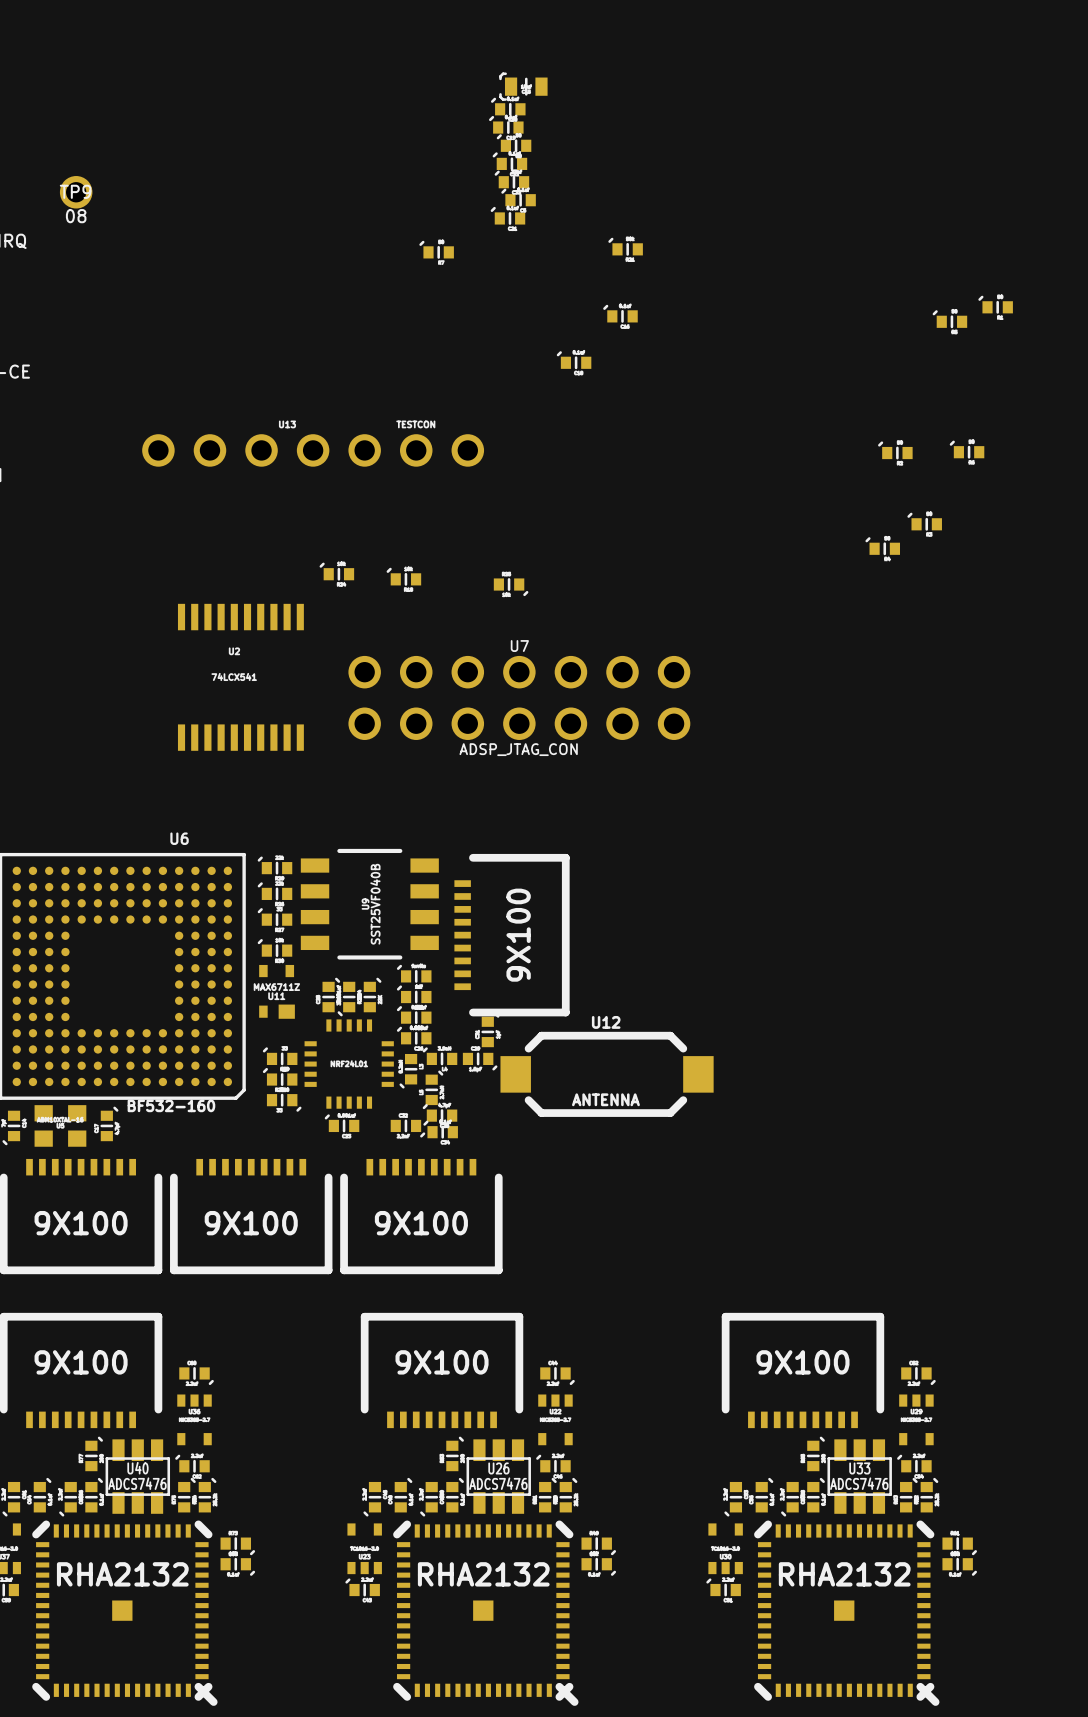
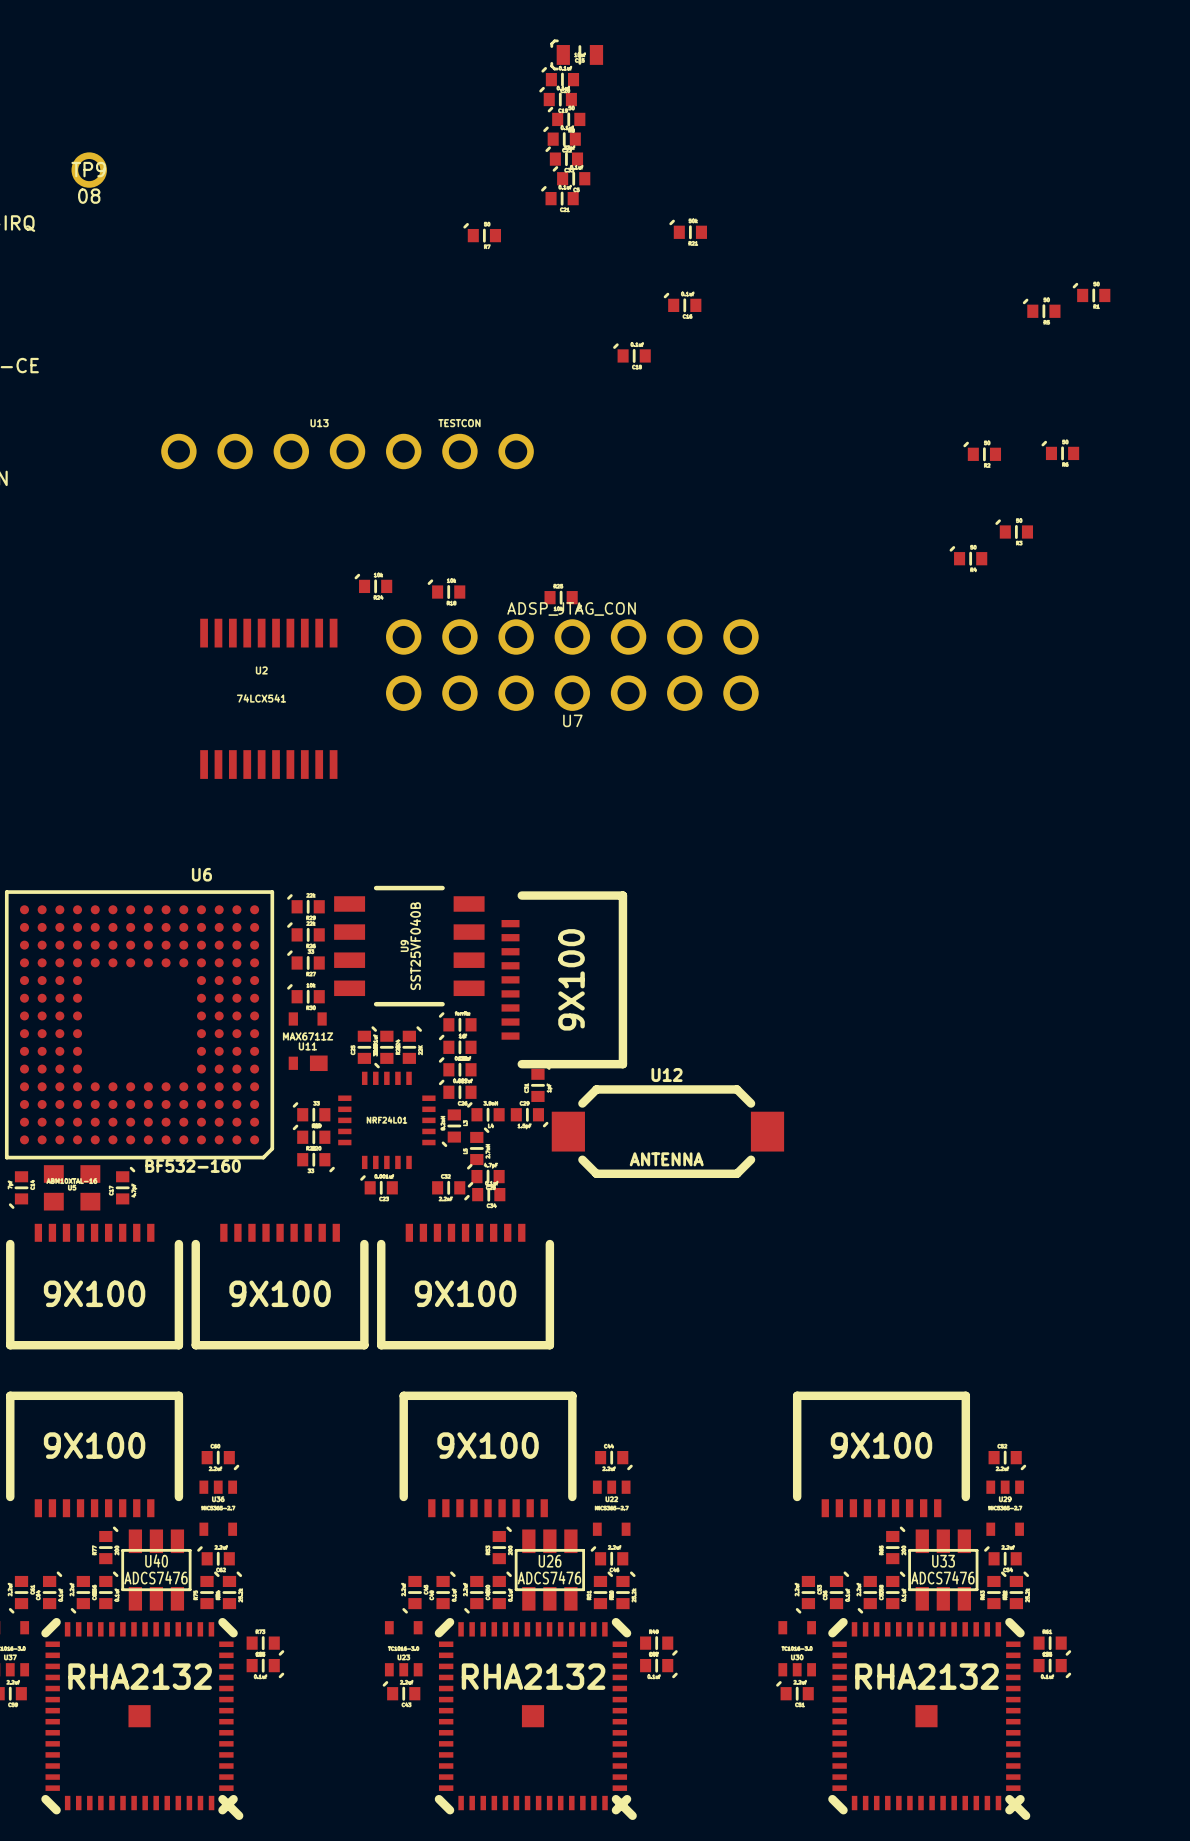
U7 name position: U7 (519, 646) -> U7 (572, 720)
U7 position: (519, 697) -> (572, 665)
U7 value position: ADSP_JTAG_CON (518, 749) -> ADSP_JTAG_CON (571, 609)

